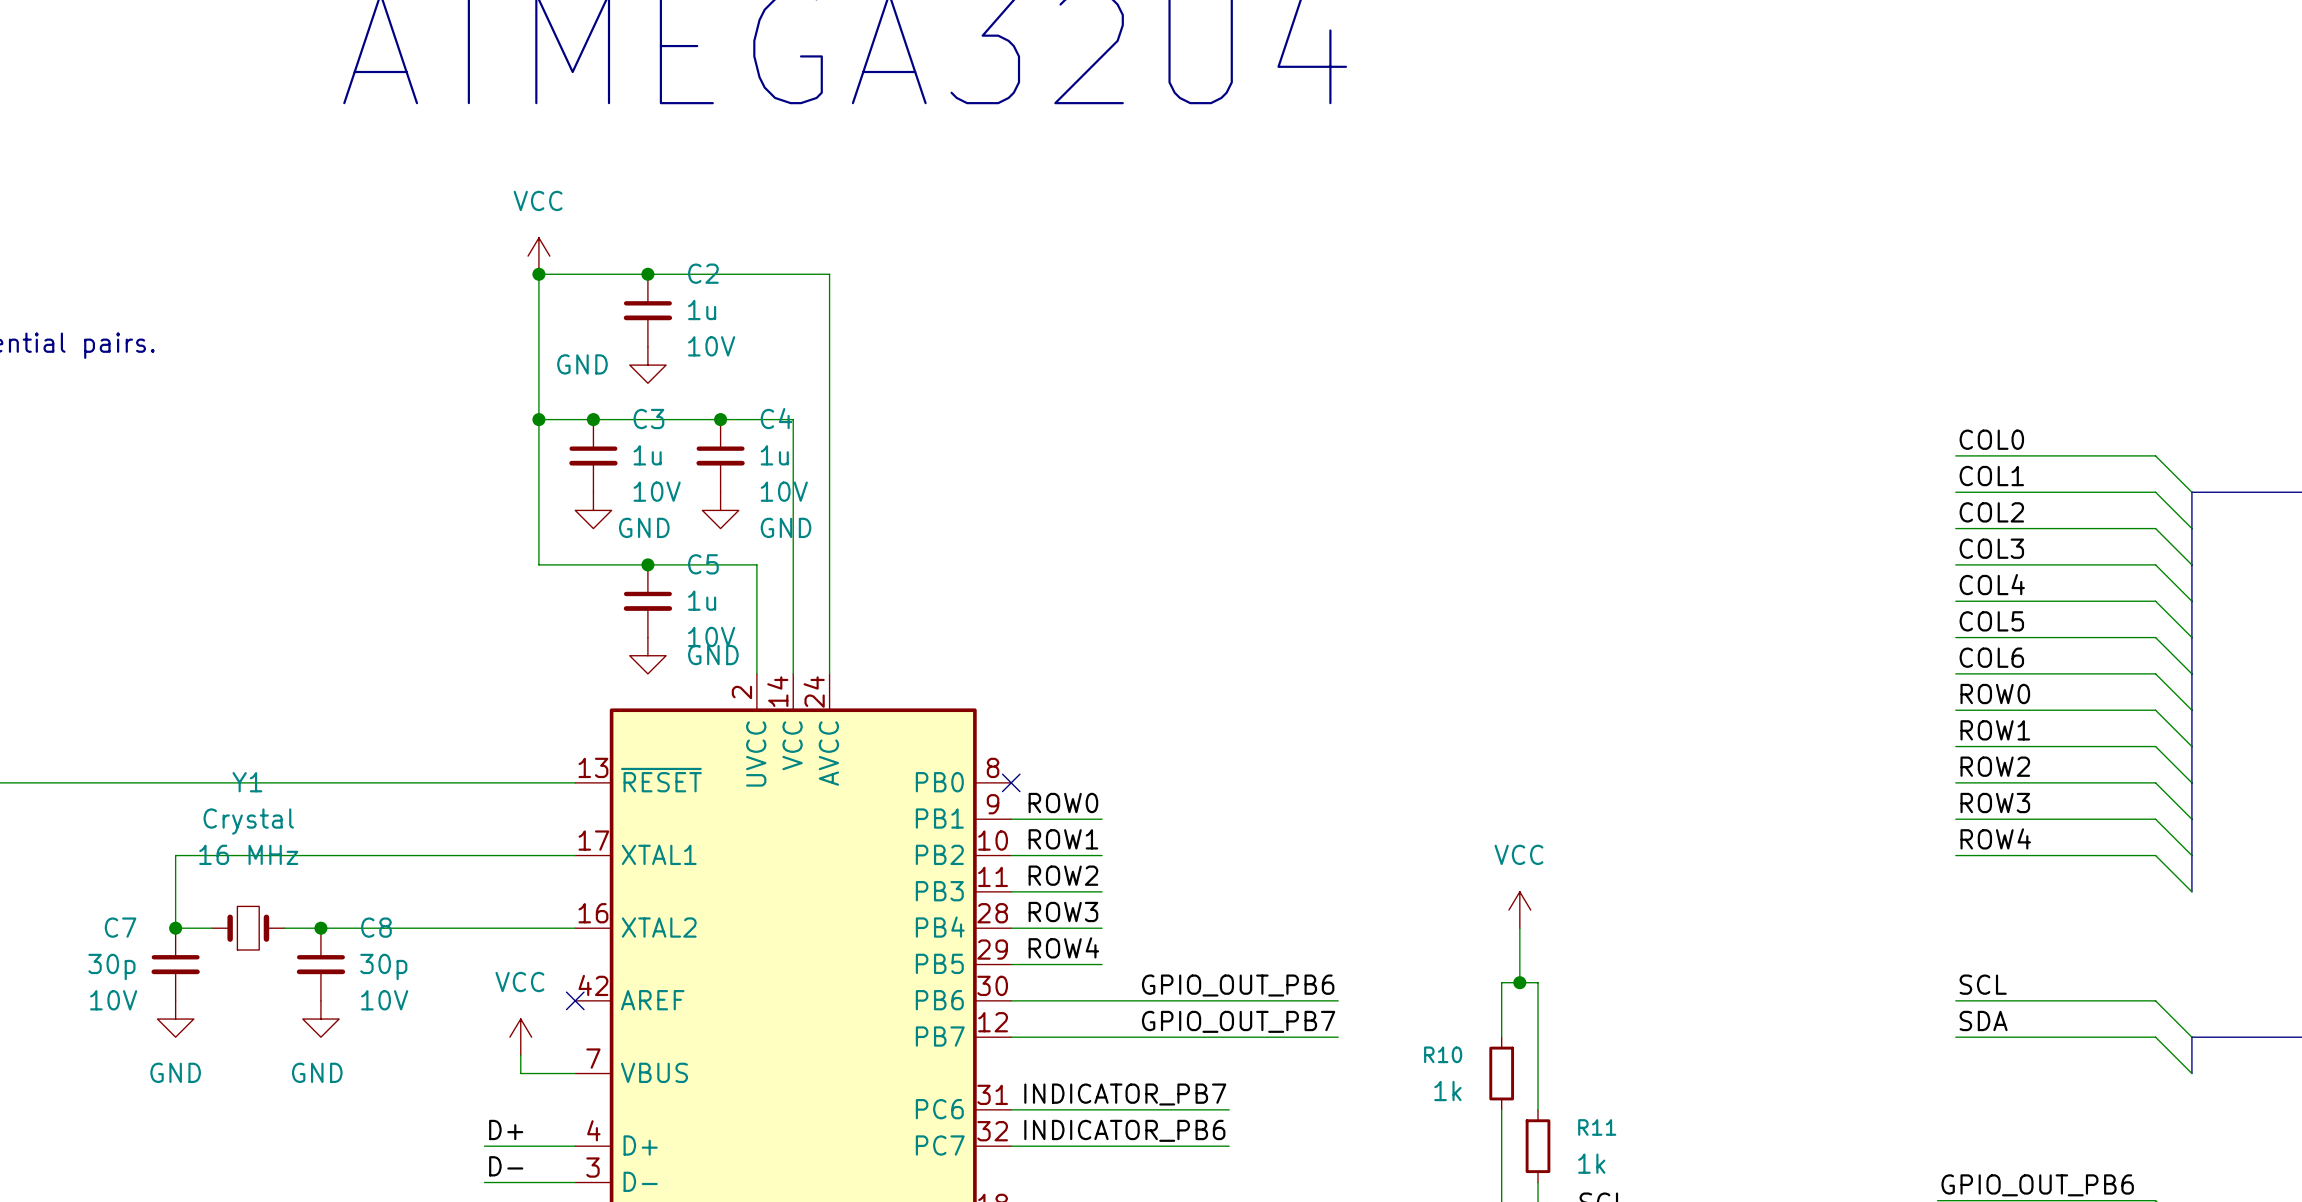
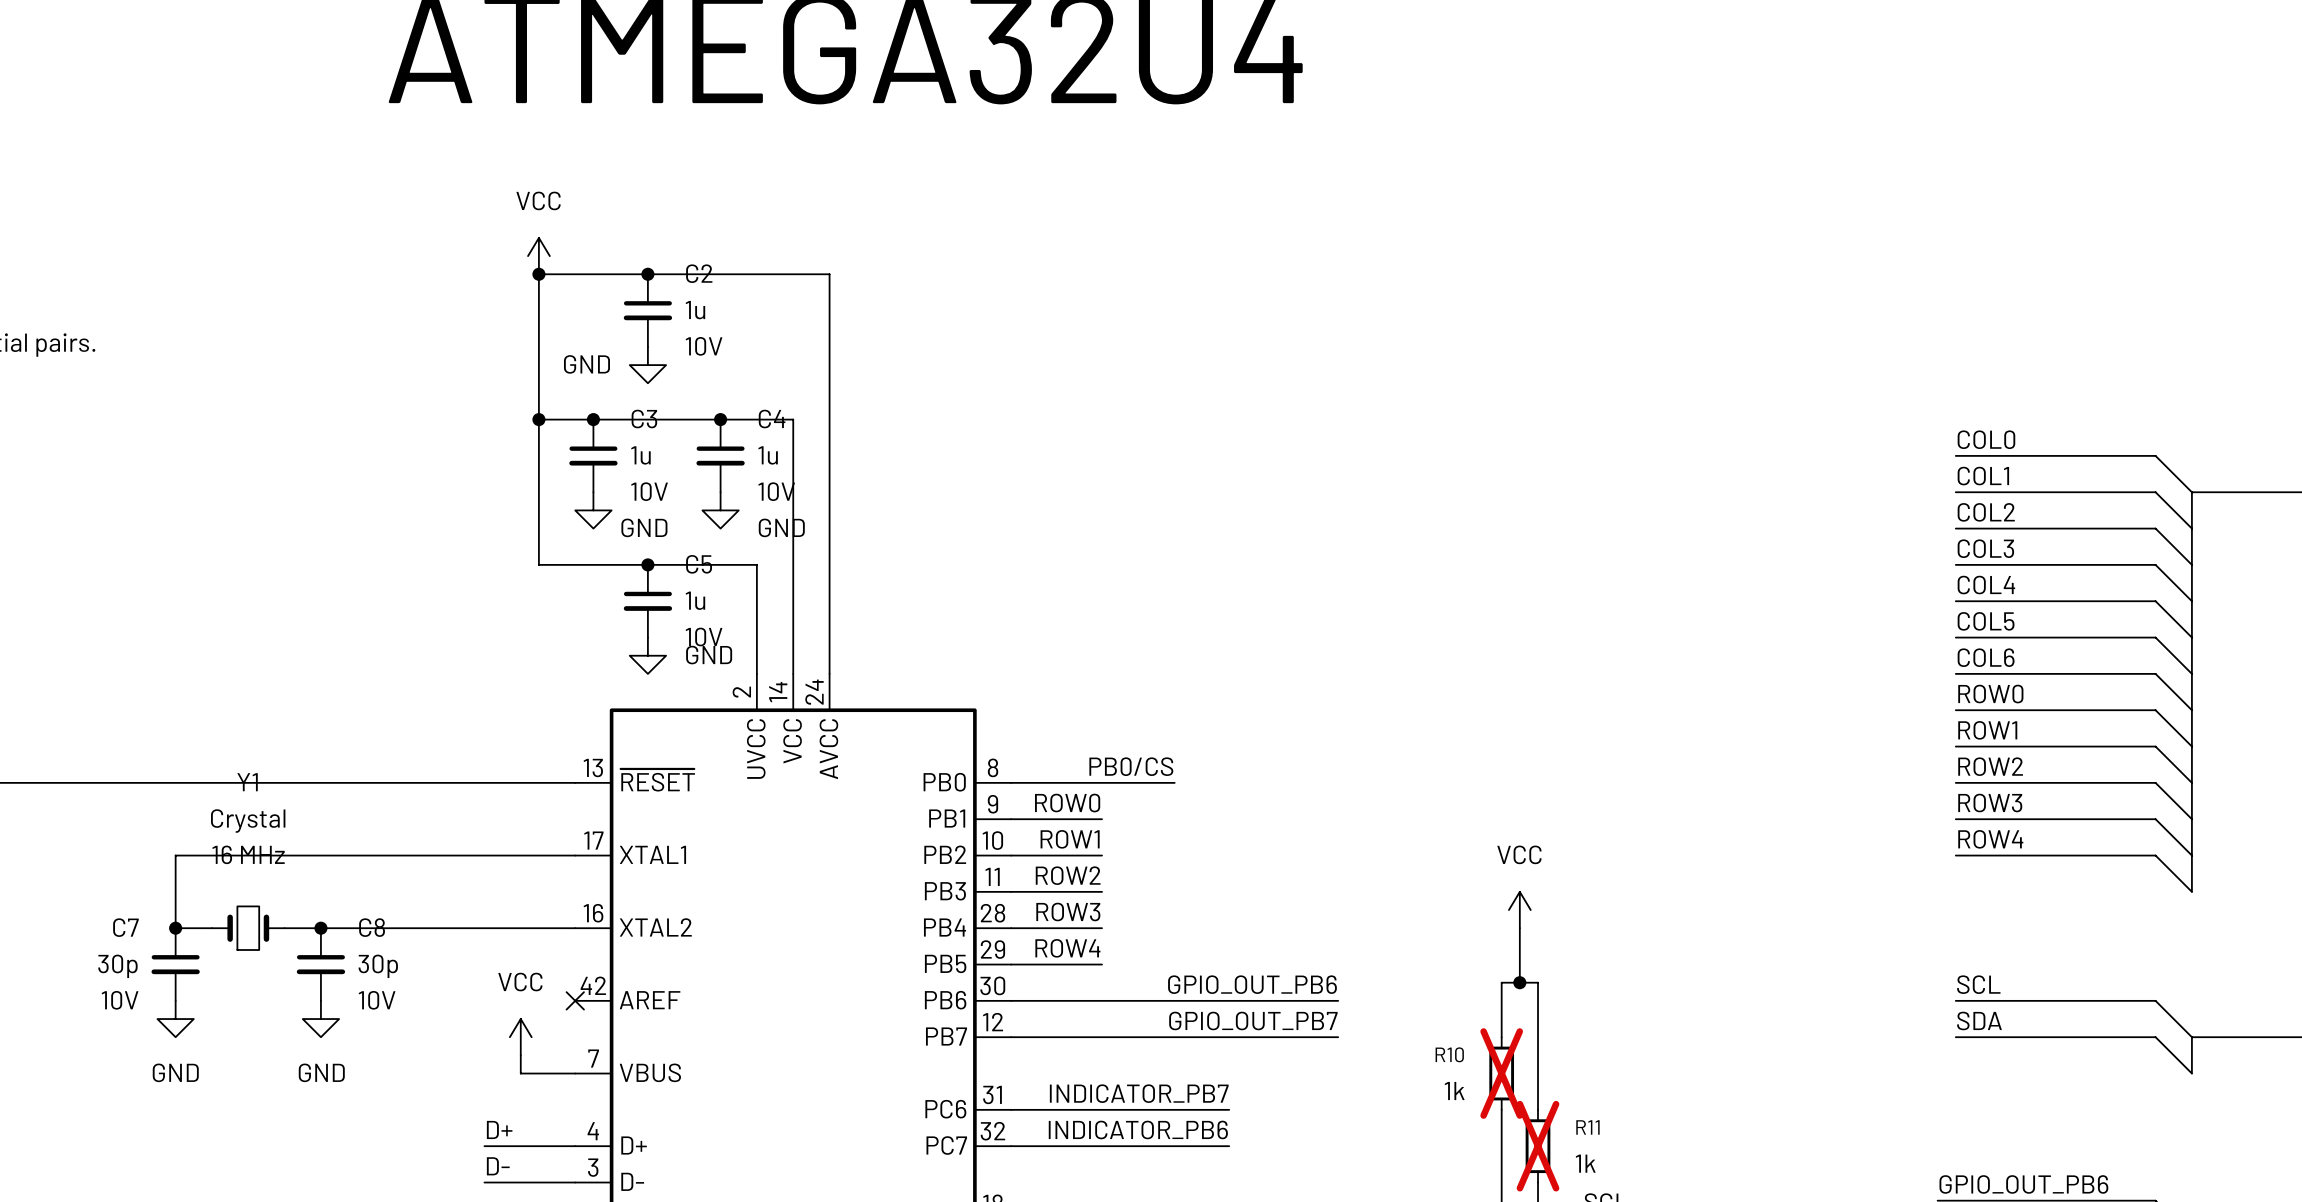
label: none -> PB0/CS (1131, 766)
wire: none -> (1011, 782) (1174, 782)
no-connect mark: (1011, 782) -> none
R10 do-not-place cross: none -> (1501, 1073)
R11 do-not-place cross: none -> (1538, 1146)

